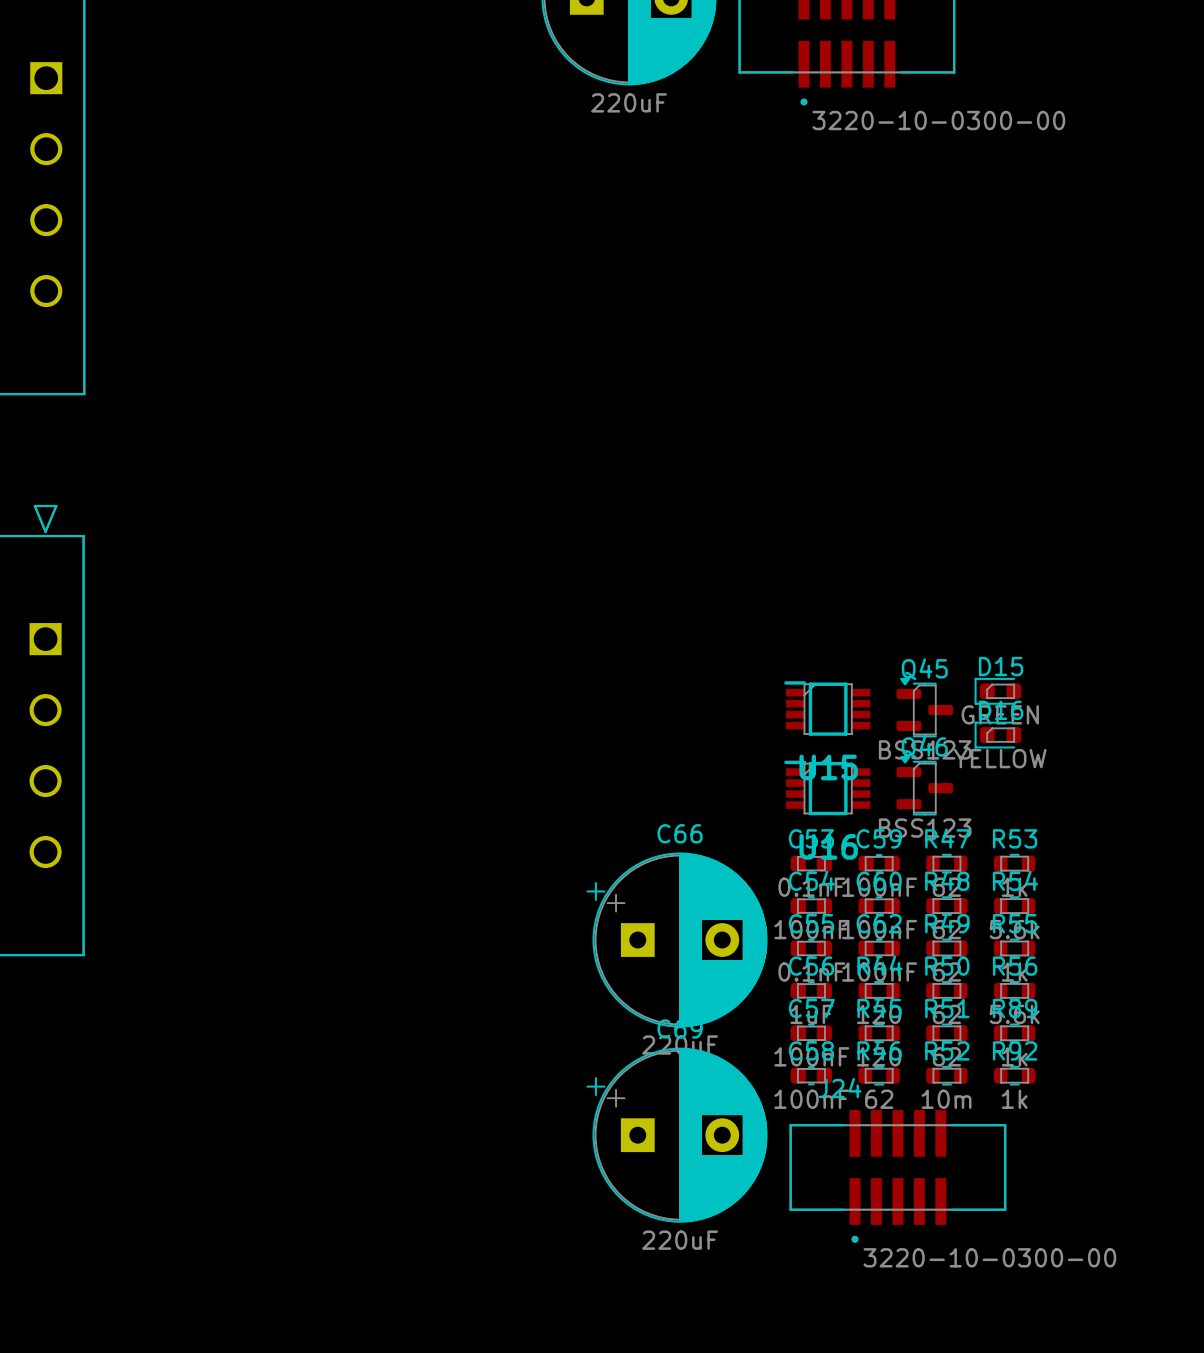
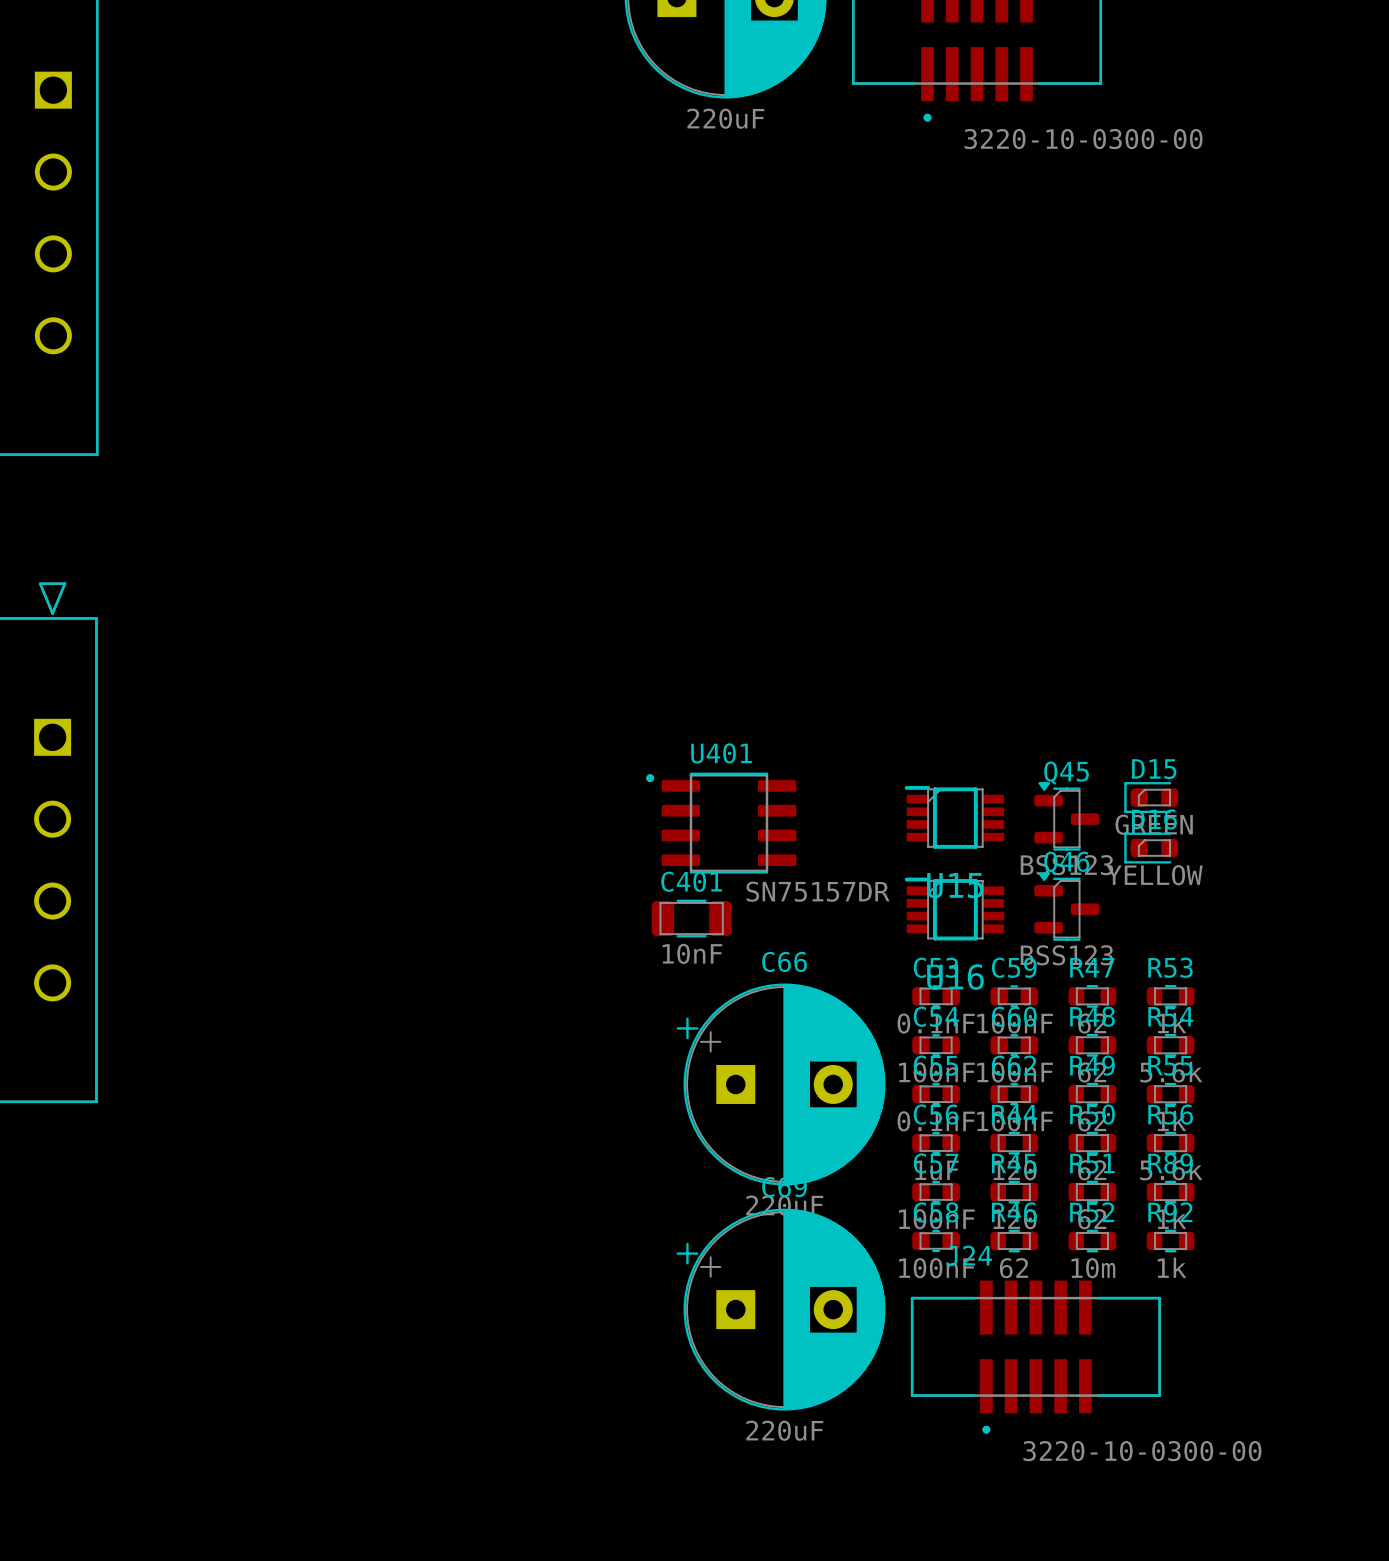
U401: none -> SN75157DR (721, 823)
C401: none -> 10nF (691, 918)

